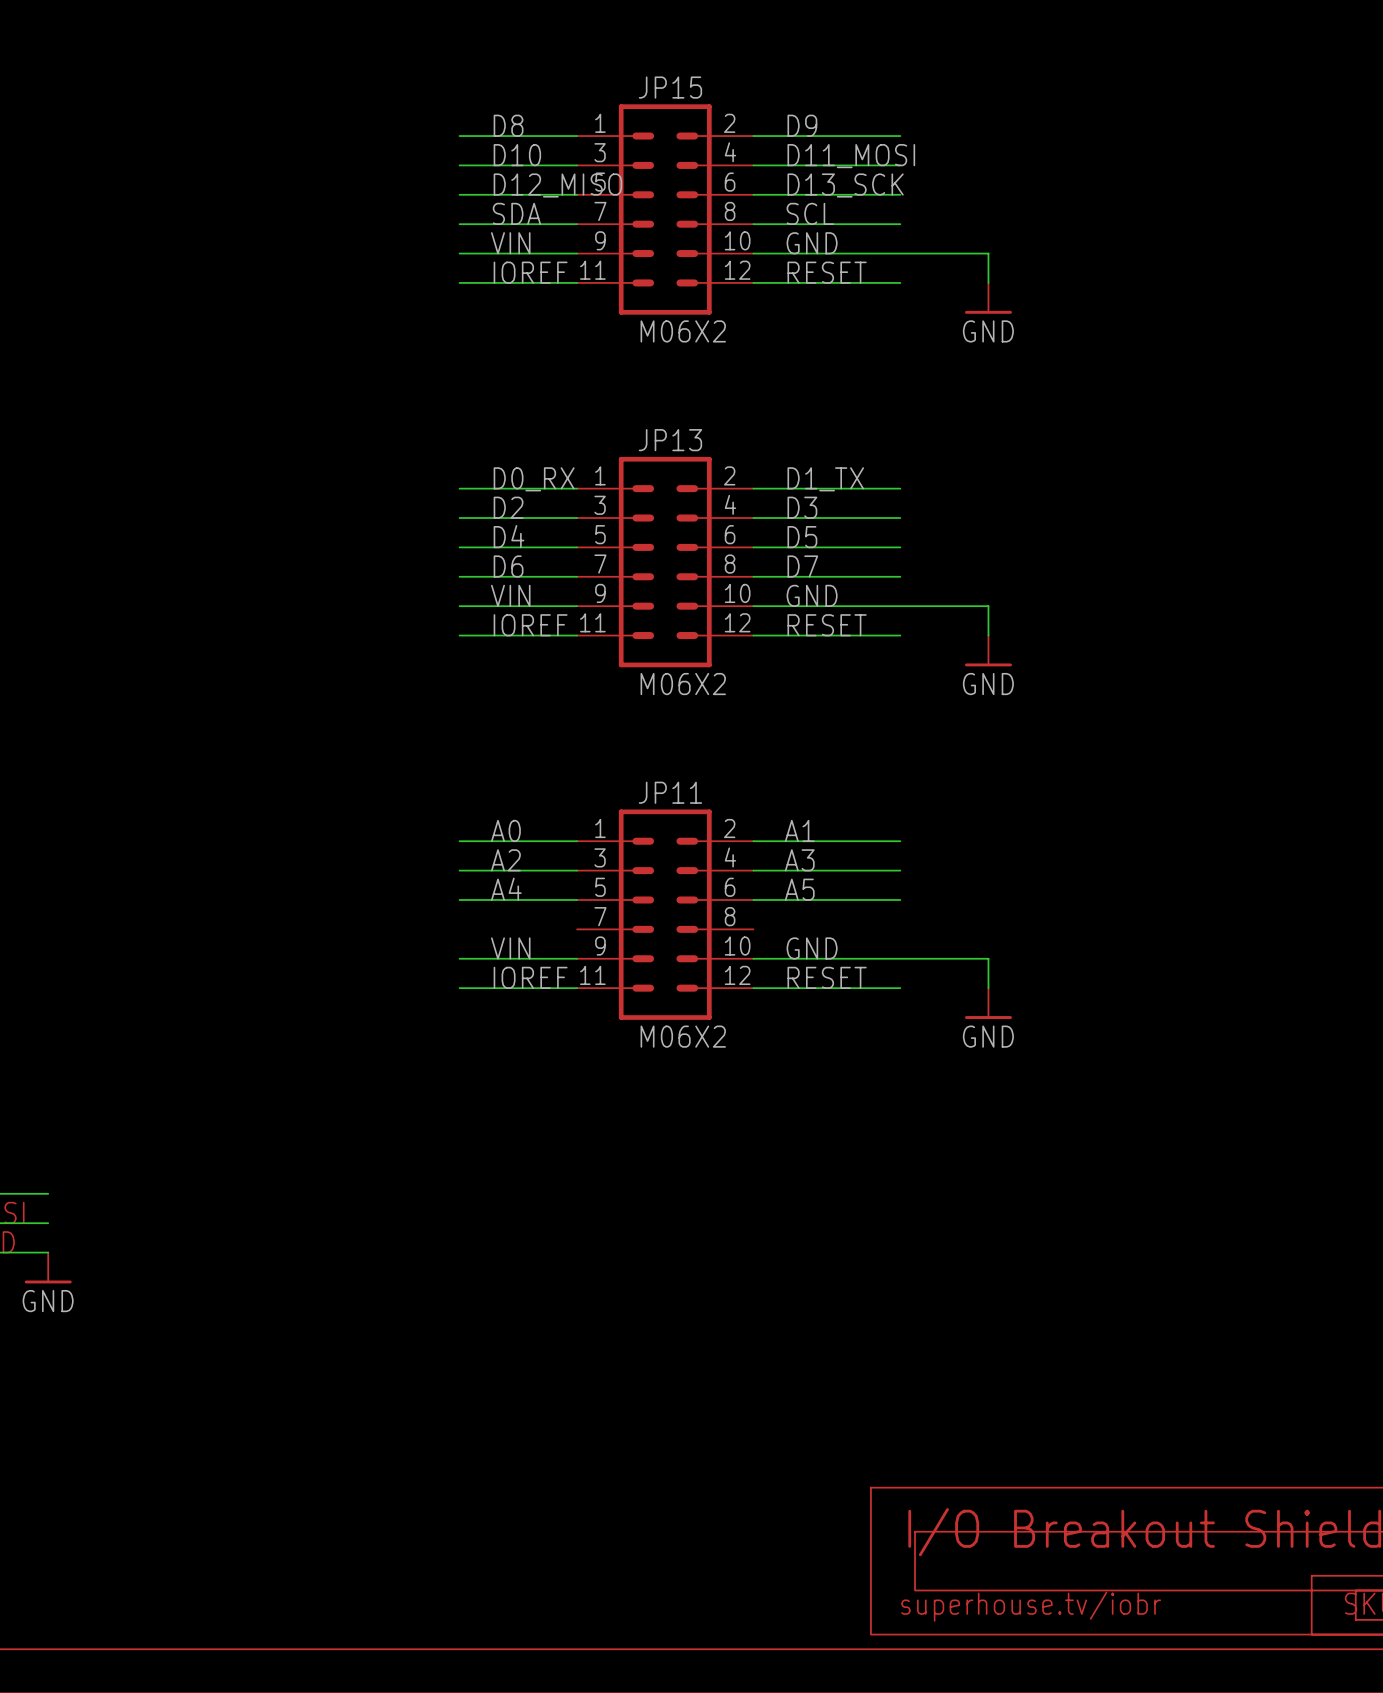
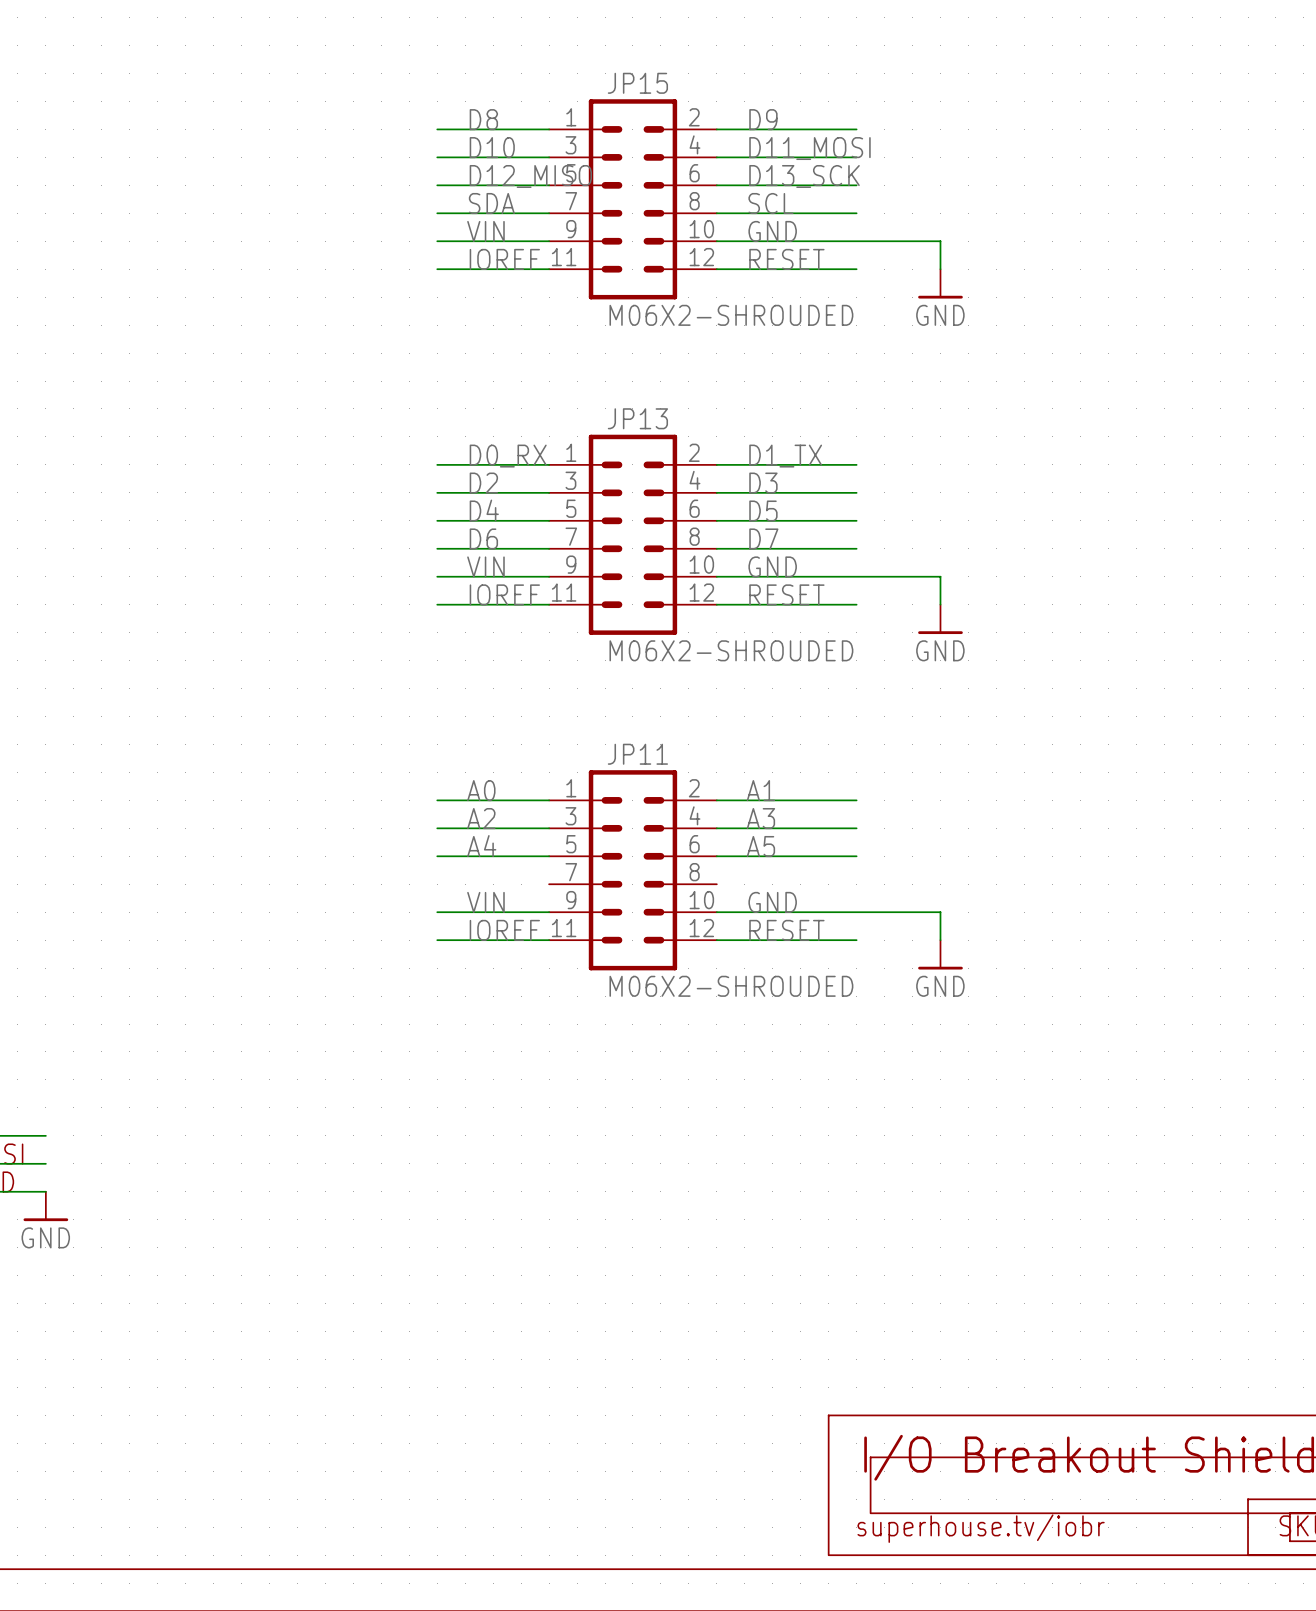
JP15 value: M06X2 (683, 331) -> M06X2-SHROUDED (731, 315)
JP13 value: M06X2 (683, 684) -> M06X2-SHROUDED (731, 650)
JP11 value: M06X2 (683, 1036) -> M06X2-SHROUDED (731, 986)

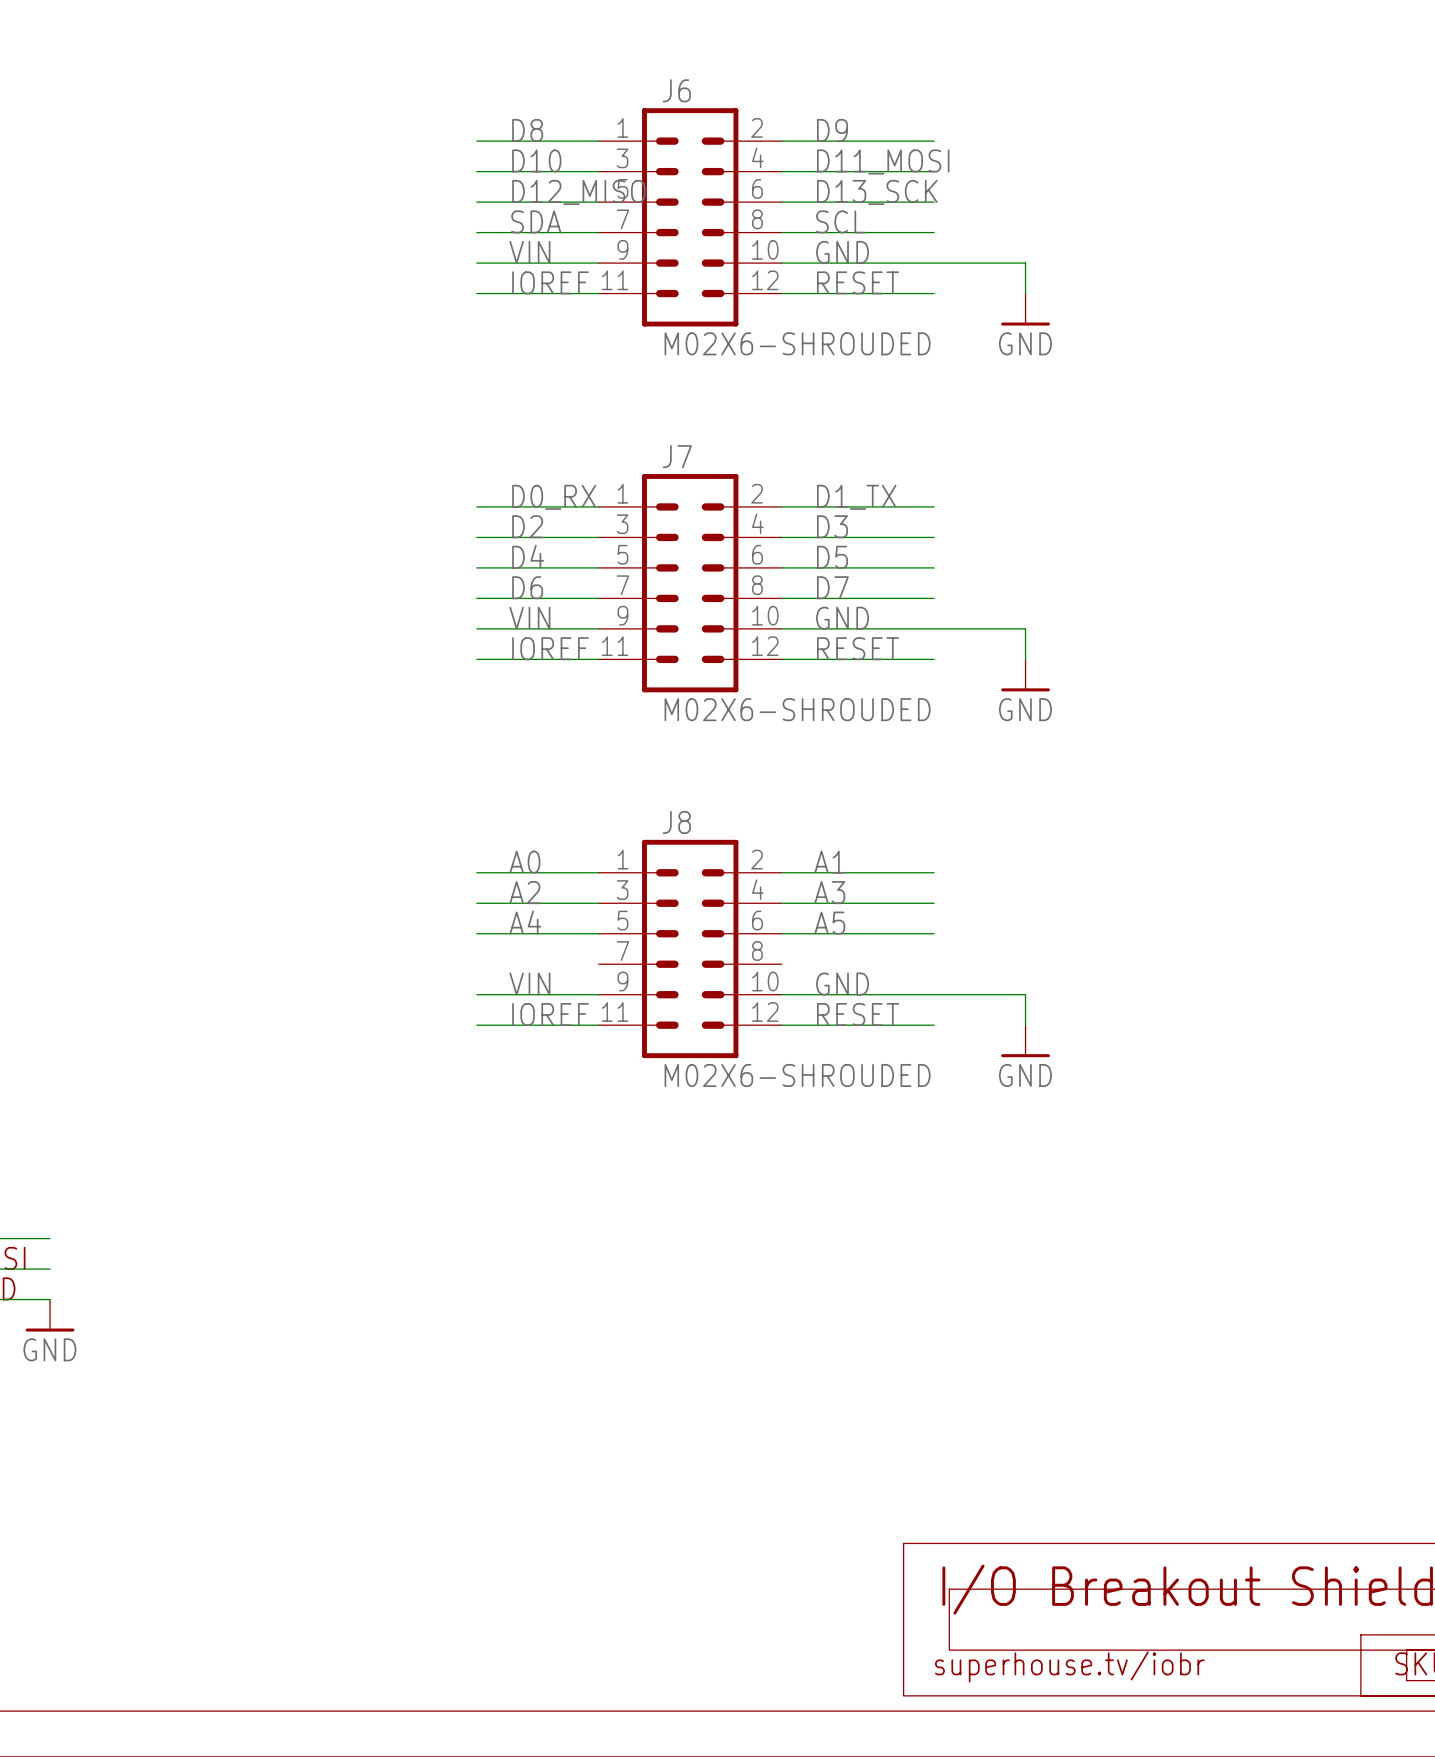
JP15 name: JP15 (637, 83) -> J6 (676, 90)
JP15 value: M06X2-SHROUDED (731, 315) -> M02X6-SHROUDED (797, 343)
JP13 name: JP13 (637, 418) -> J7 (677, 456)
JP13 value: M06X2-SHROUDED (731, 650) -> M02X6-SHROUDED (797, 709)
JP11 name: JP11 (637, 754) -> J8 (676, 822)
JP11 value: M06X2-SHROUDED (731, 986) -> M02X6-SHROUDED (797, 1075)

